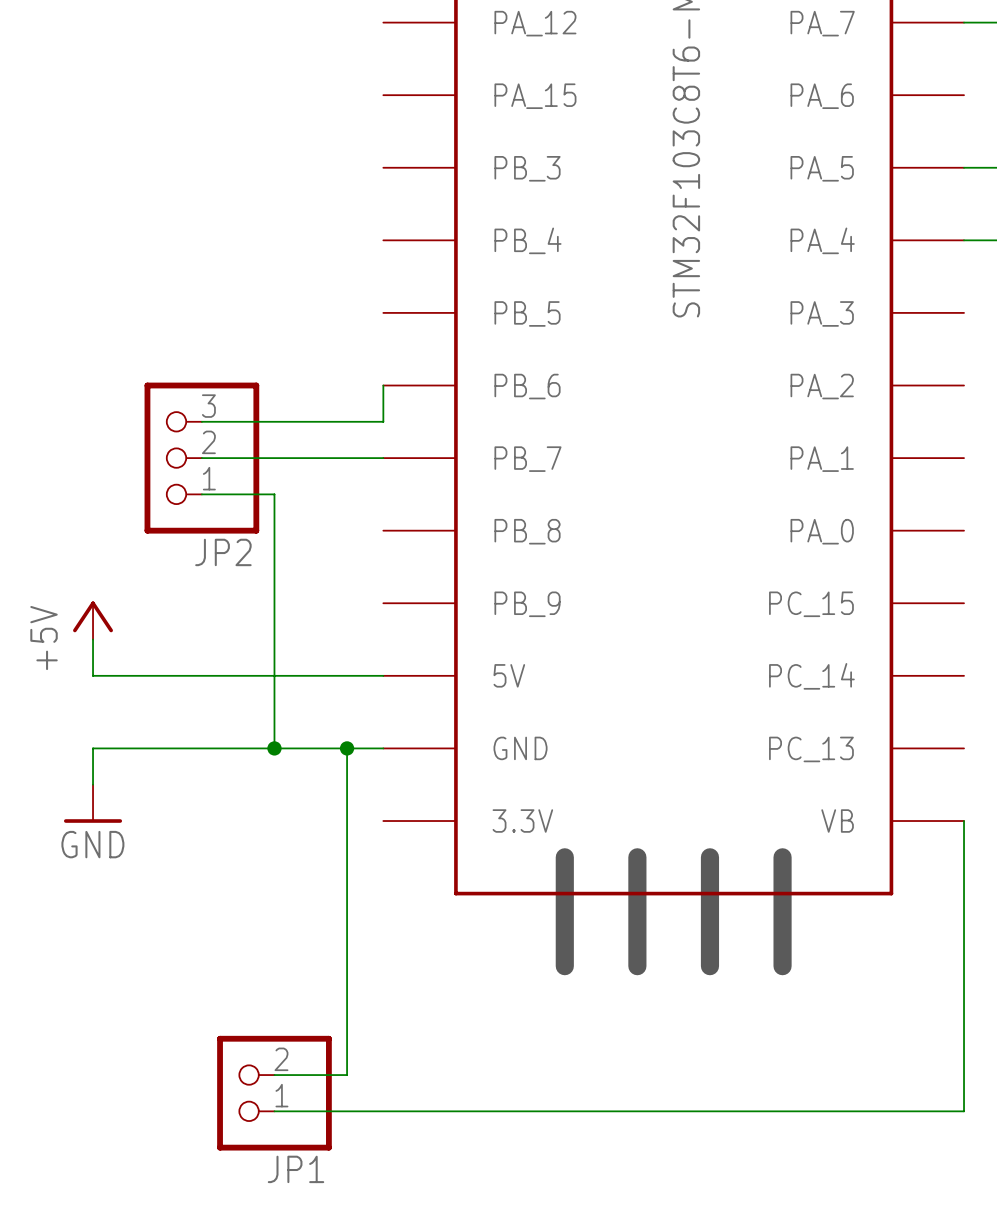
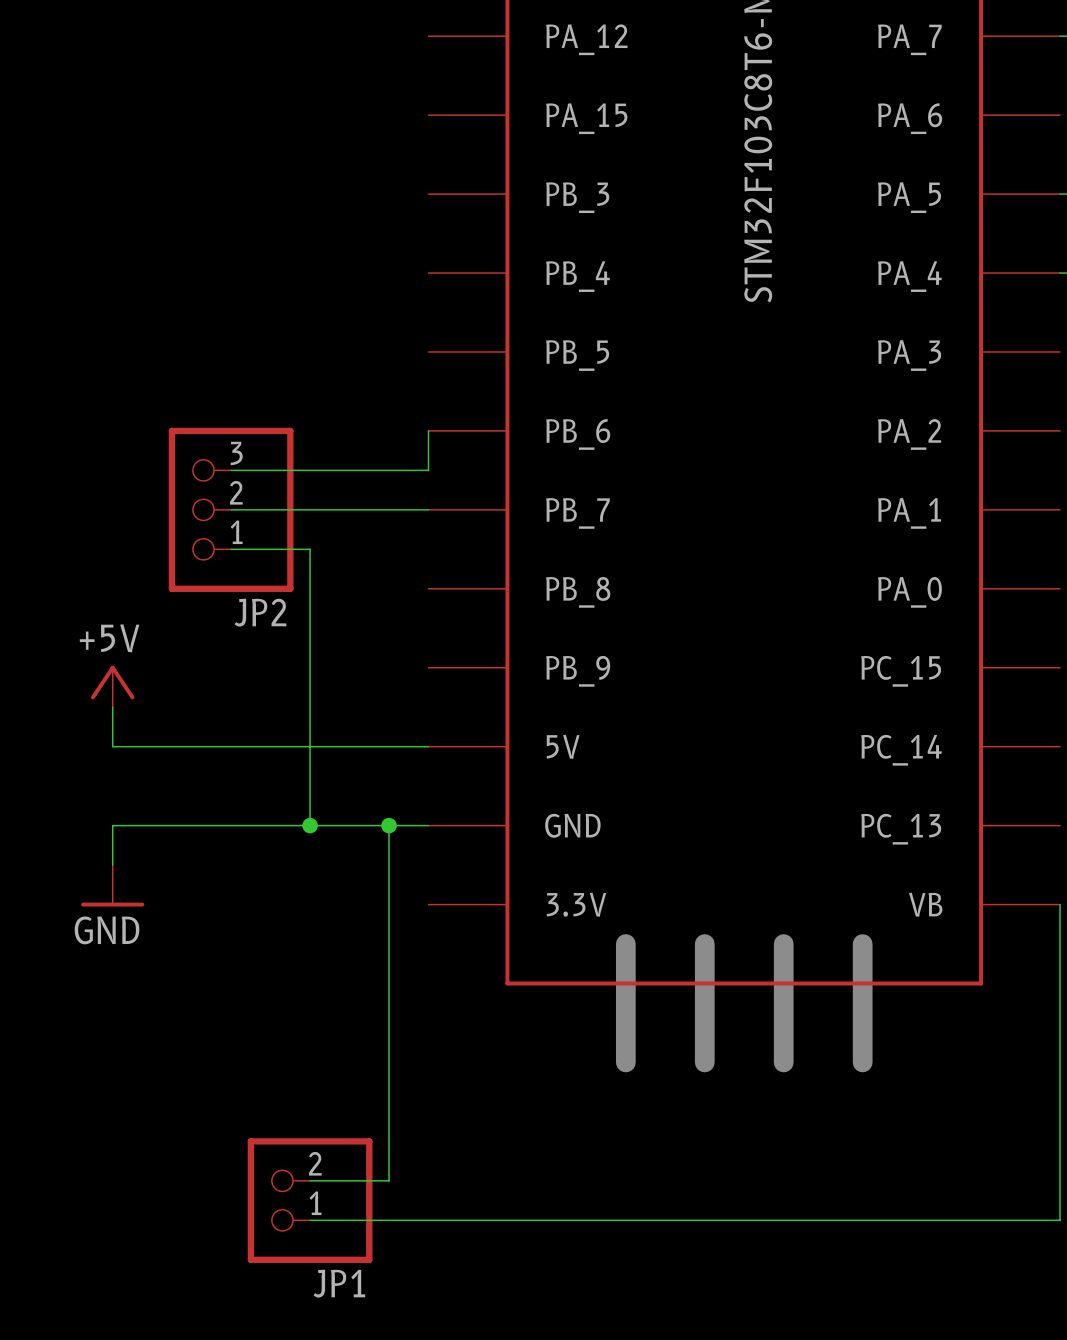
power symbol text rotation: 0° (44, 638) -> 90° clockwise (109, 638)

